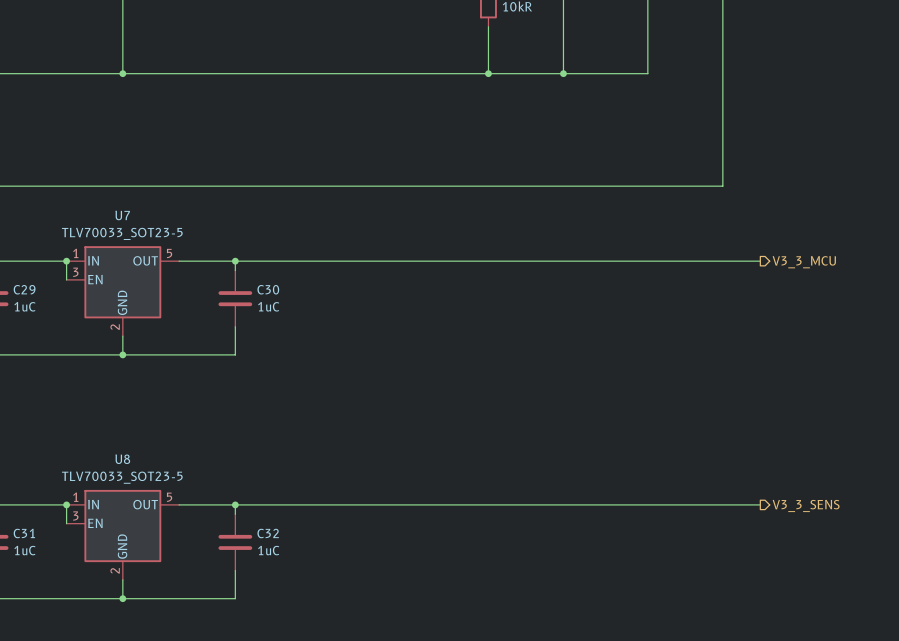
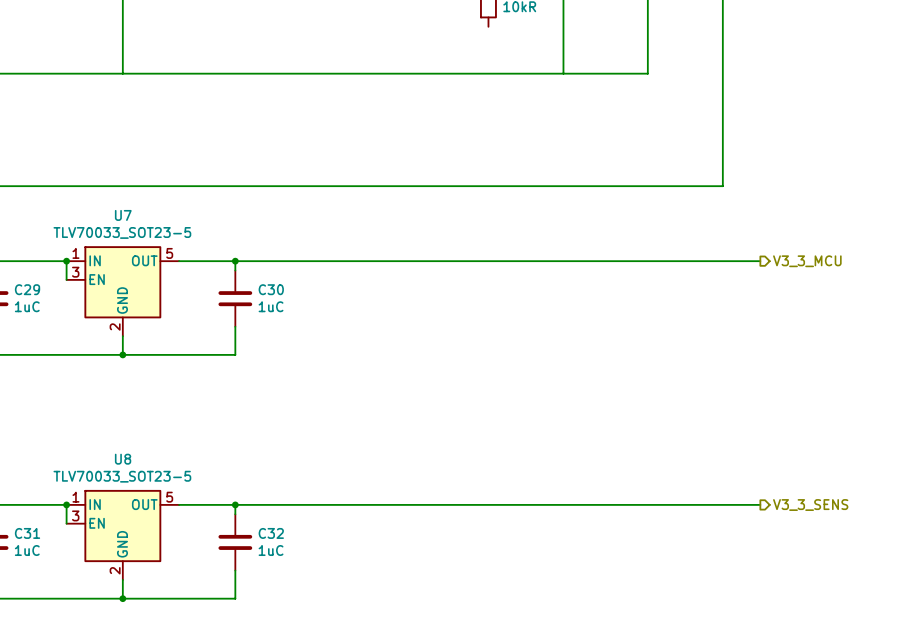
wire: (488, 26) (488, 73) -> none
junction: (122, 73) -> none
junction: (488, 73) -> none
junction: (563, 73) -> none

